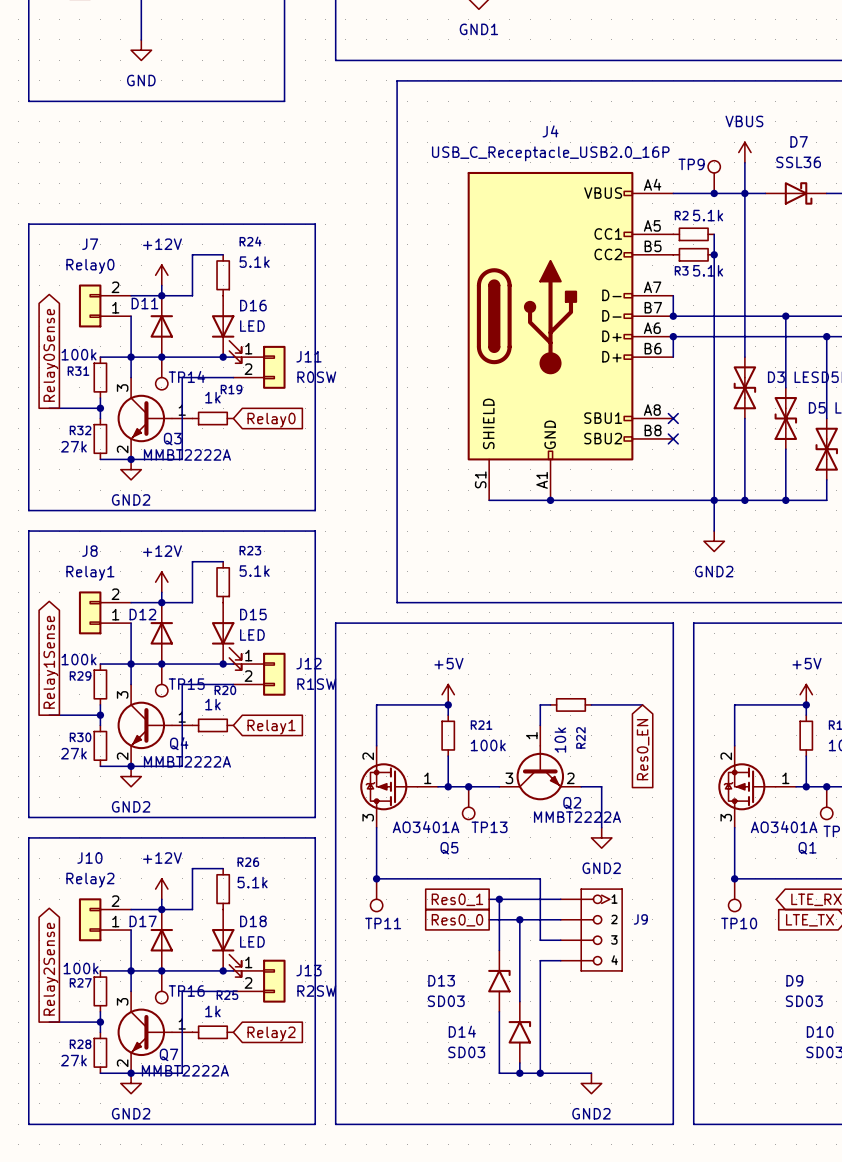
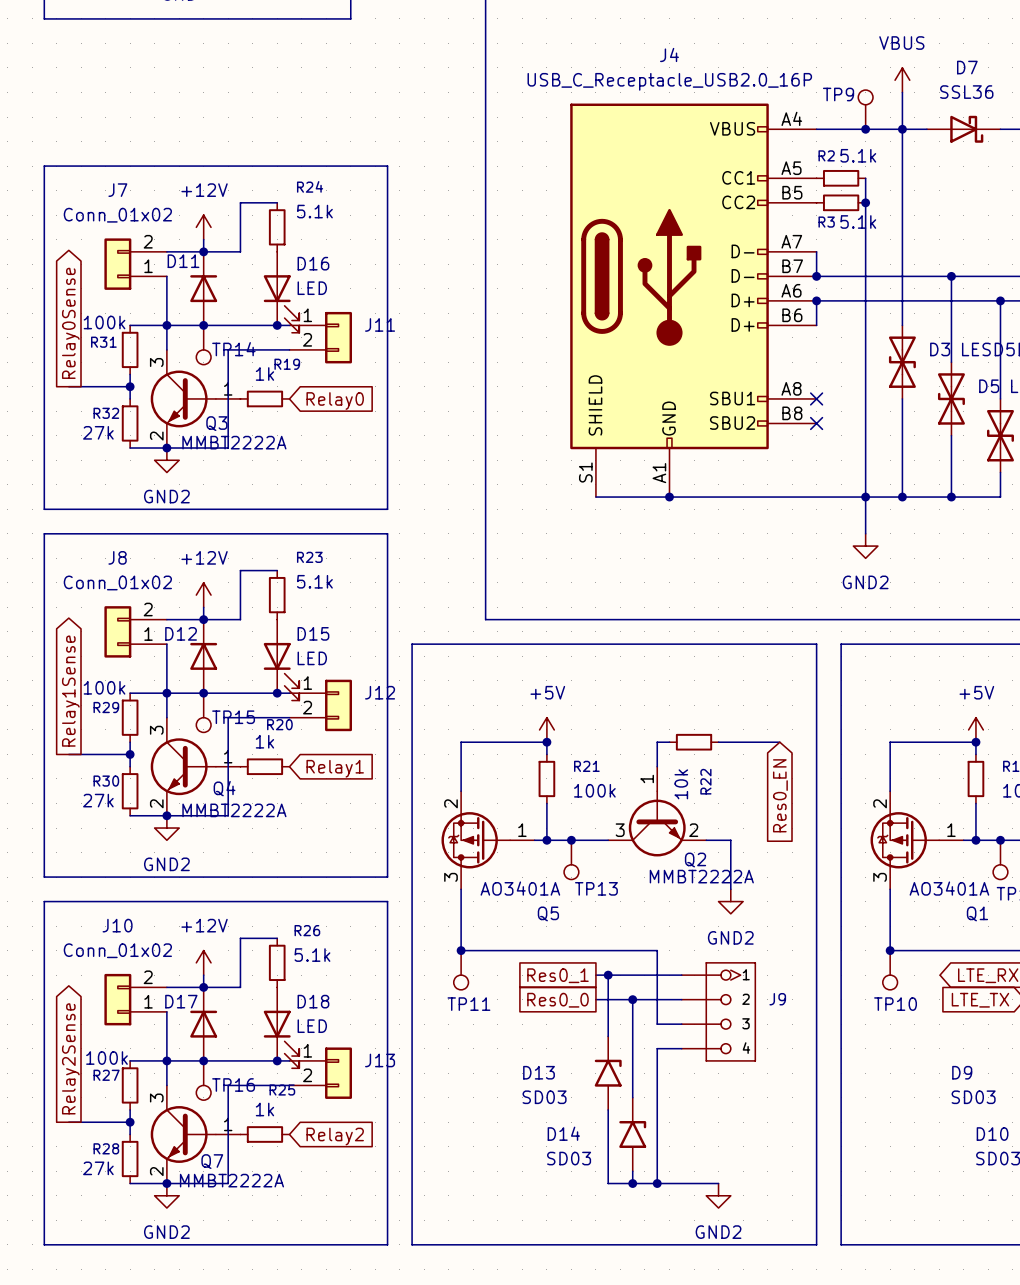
J7 value: Relay0 (90, 266) -> Conn_01x02 (117, 215)
J11 value: R0SW (316, 377) -> none
J8 value: Relay1 (90, 573) -> Conn_01x02 (117, 582)
J12 value: R1SW (316, 684) -> none
J10 value: Relay2 (90, 880) -> Conn_01x02 (117, 950)
J13 value: R2SW (316, 991) -> none

